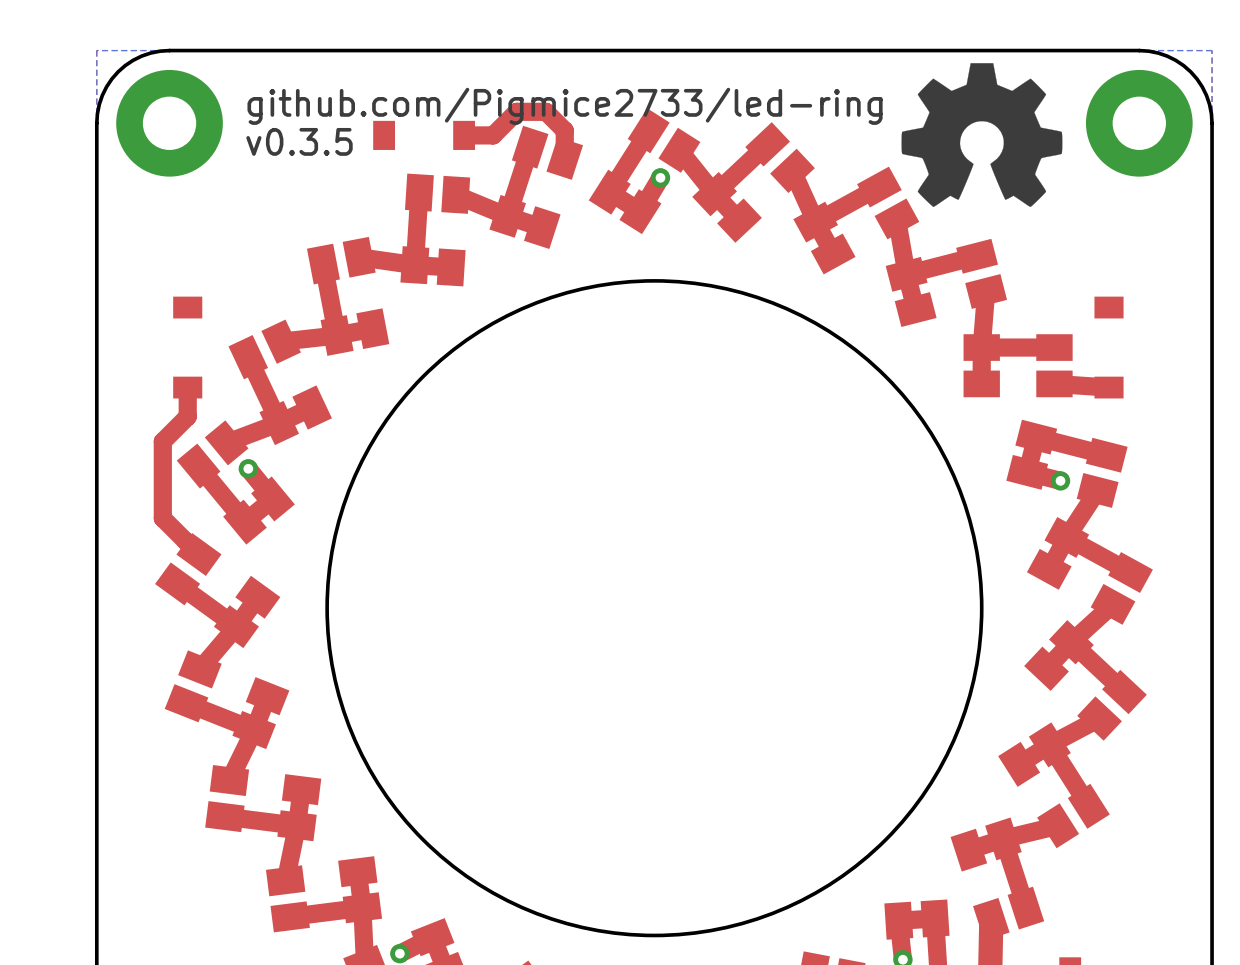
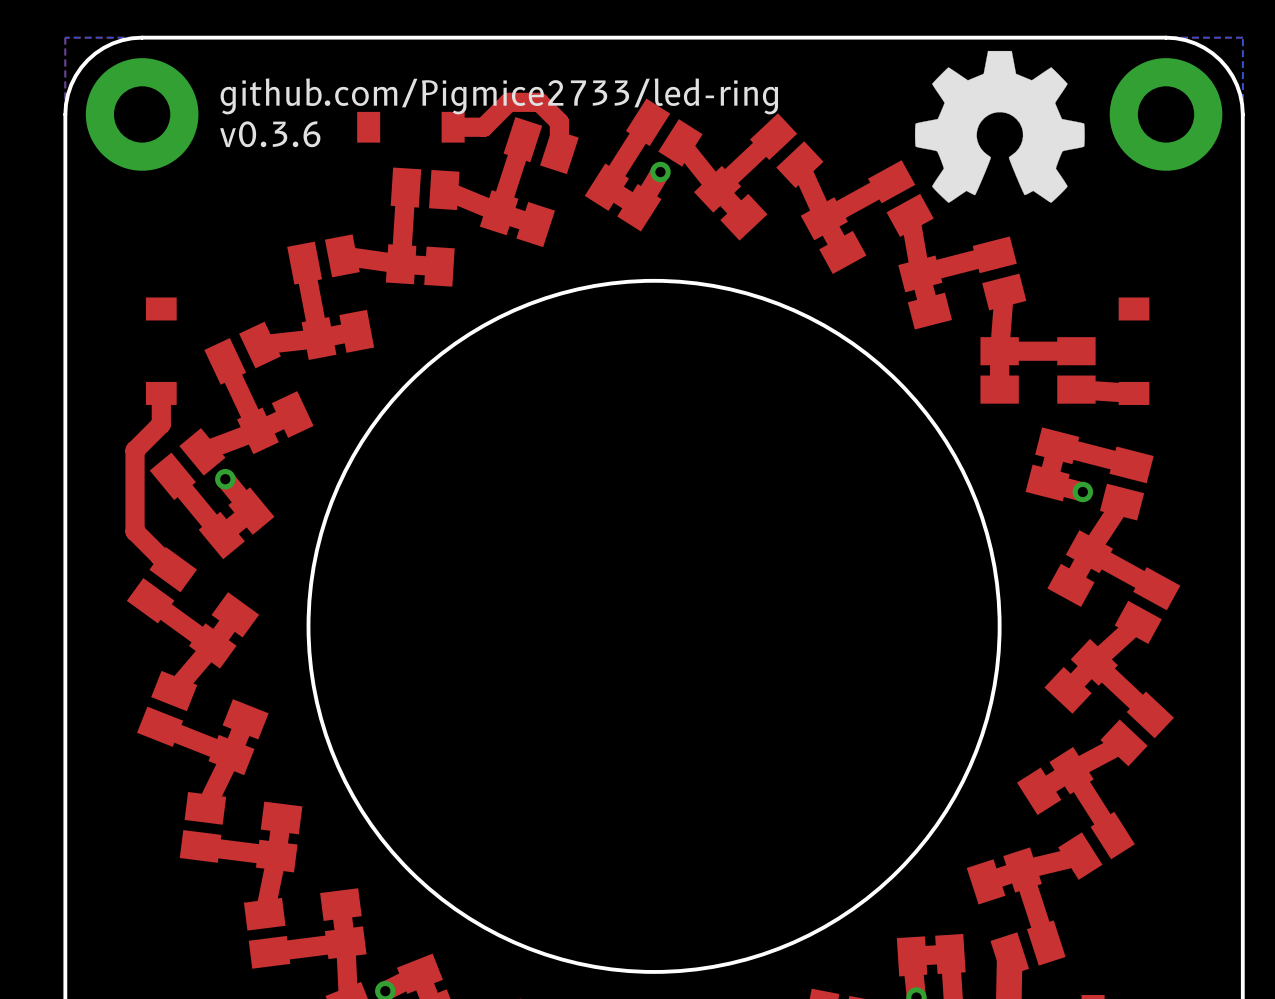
text: v0.3.5 (299, 141) -> v0.3.6 (270, 134)

